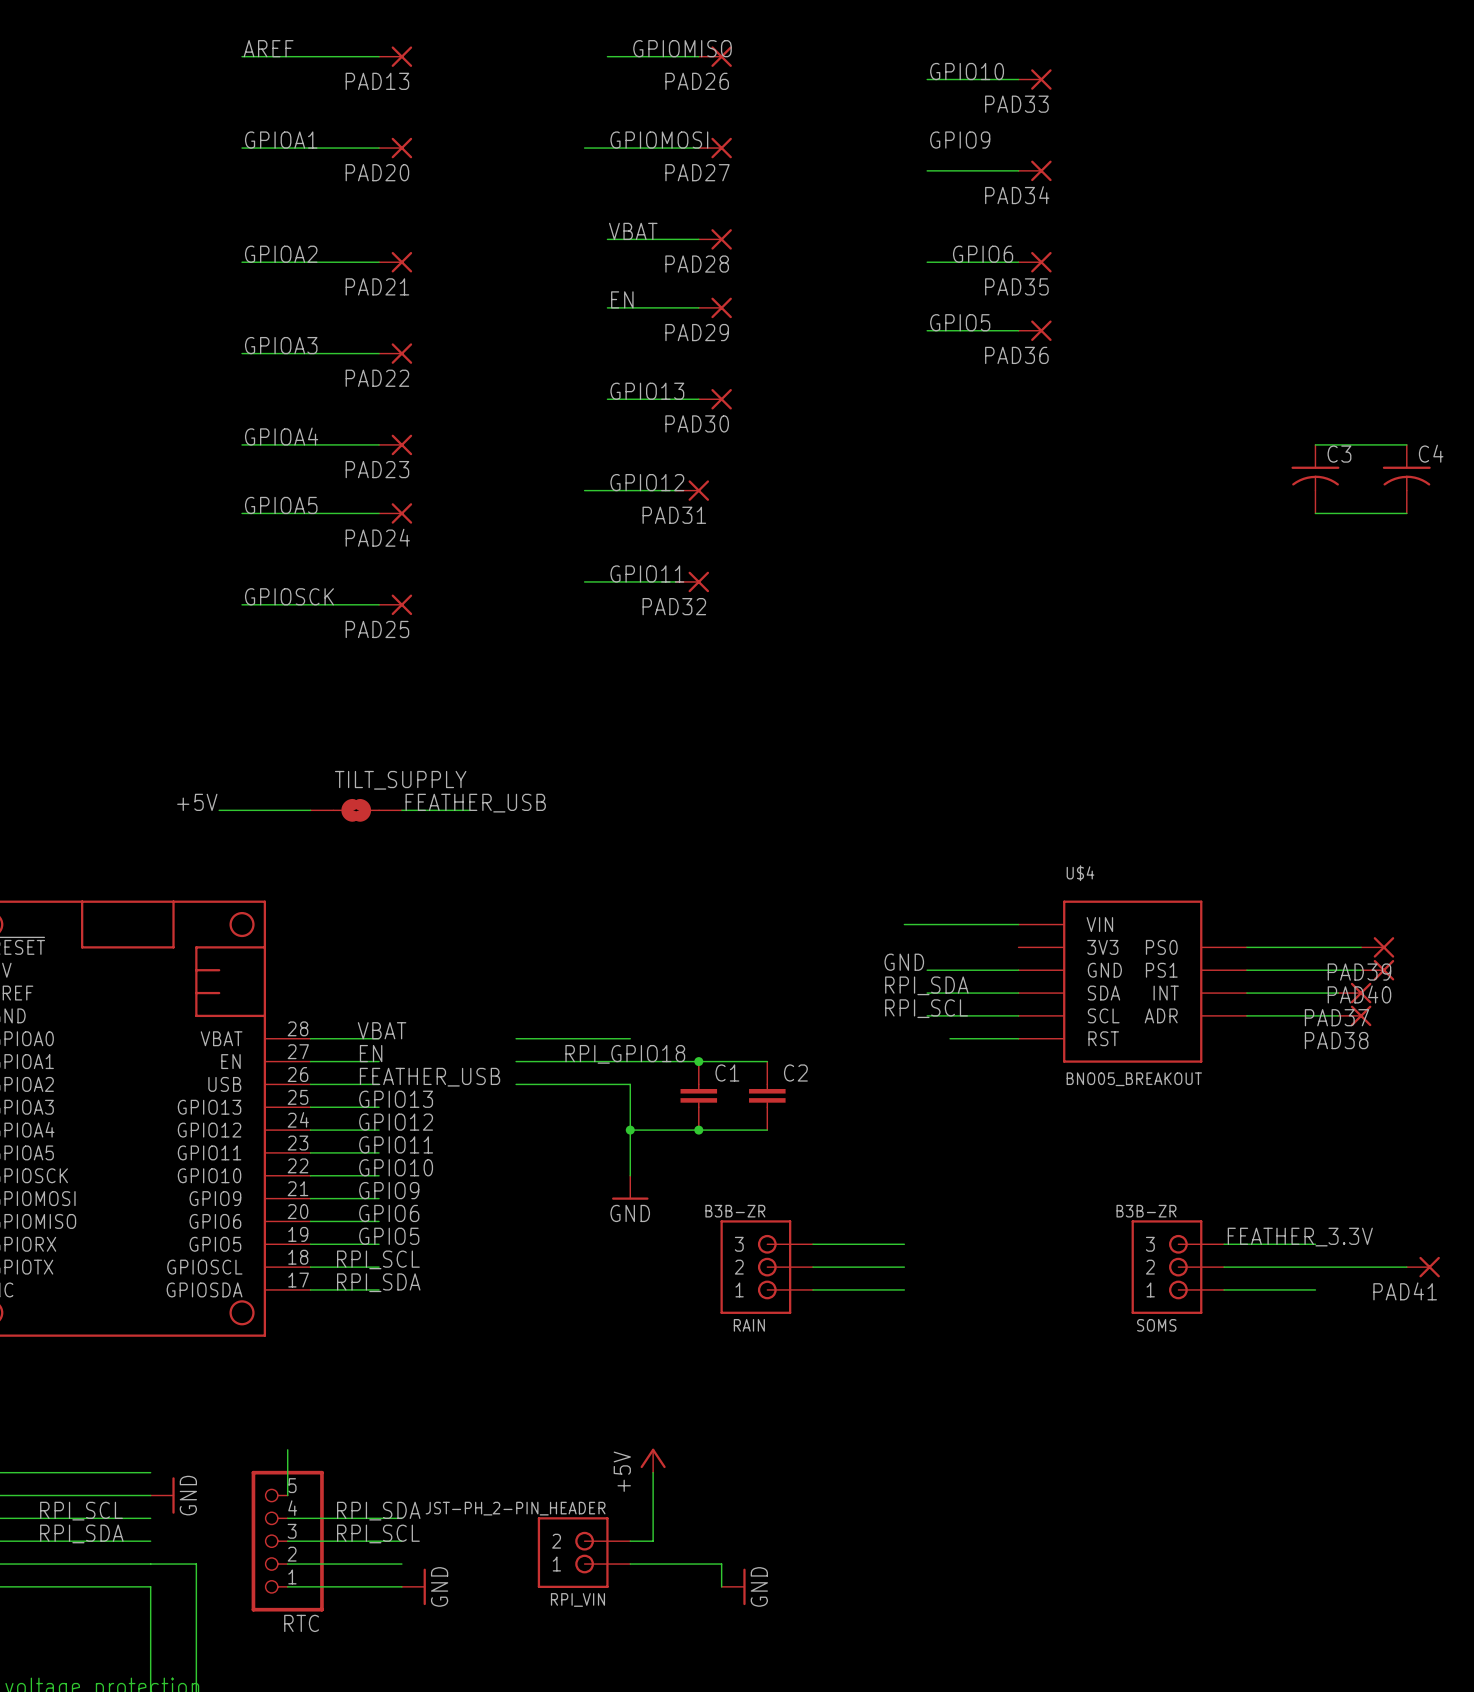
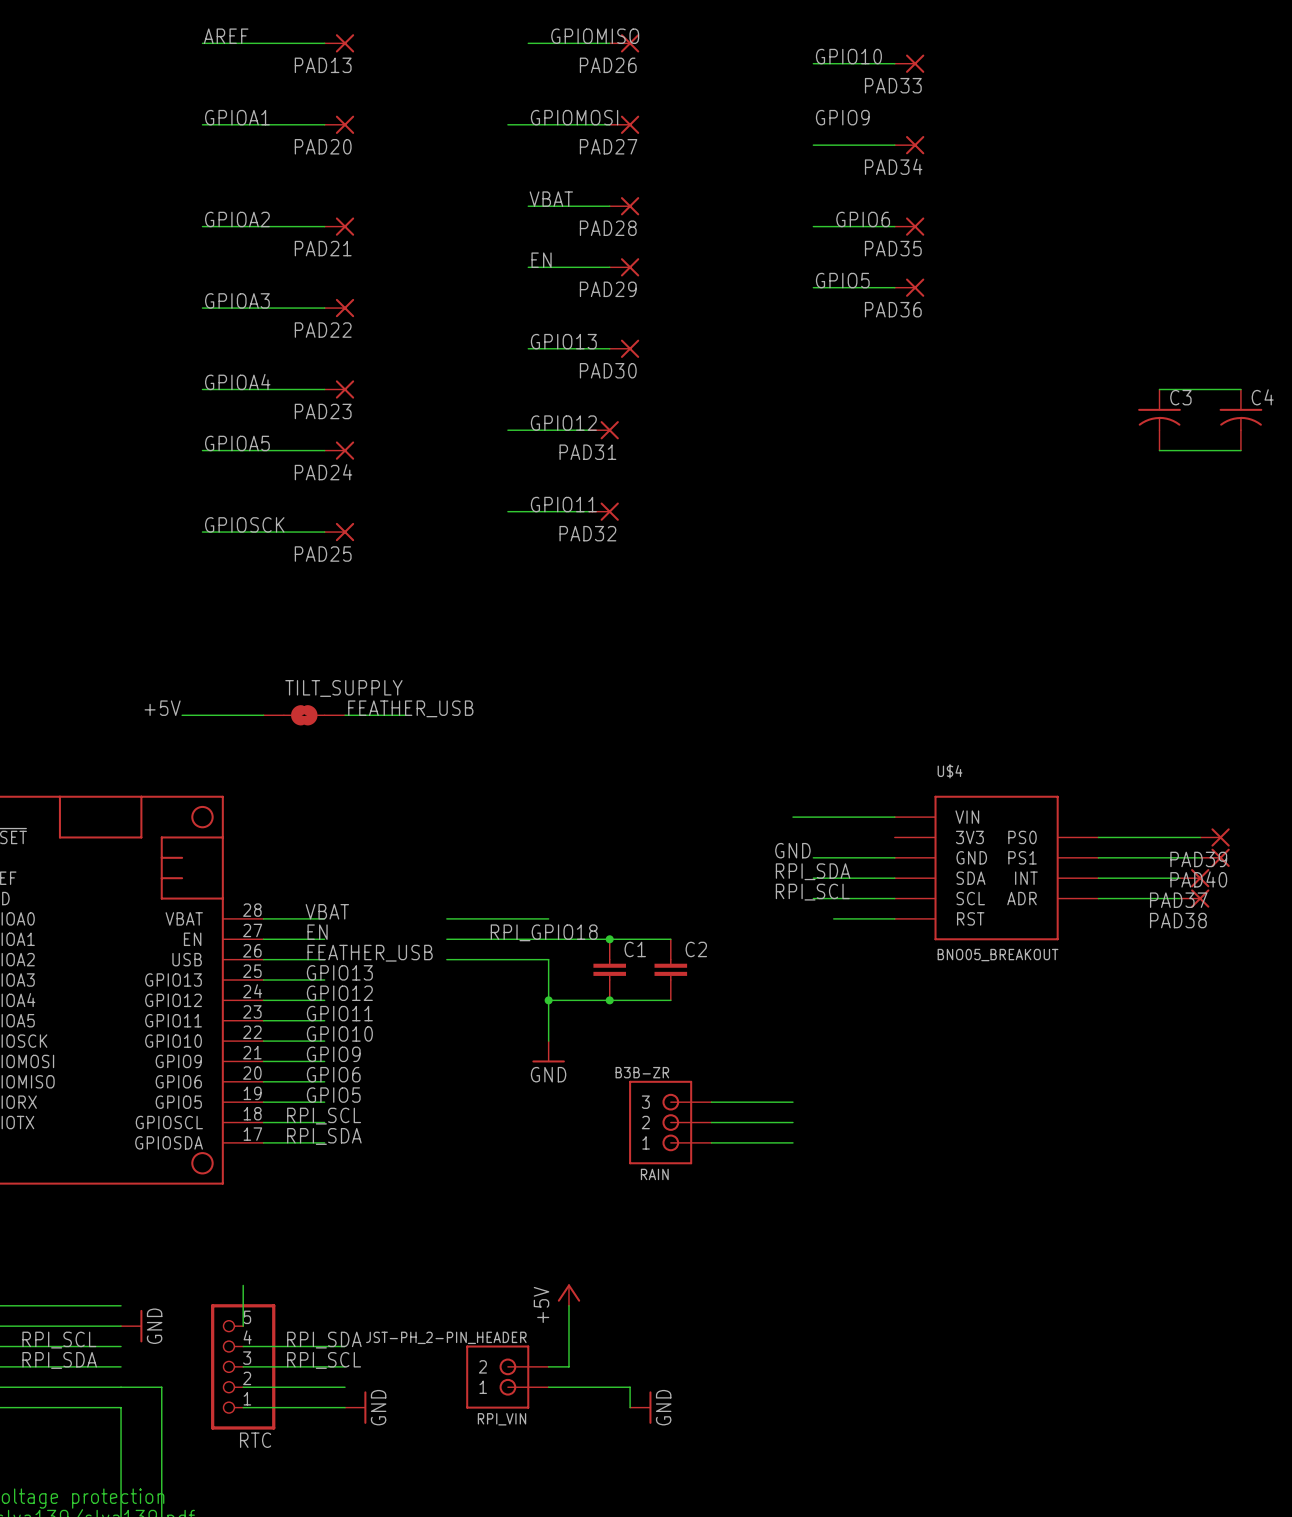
label: FEATHER_3.3V (1300, 1237) -> none
wire: (1224, 1244) (1315, 1244) -> none
SOMS: B3B-ZR (1177, 1267) -> none
wire: (1224, 1267) (1406, 1267) -> none
PAD41: (1423, 1267) -> none
wire: (1224, 1289) (1315, 1289) -> none

